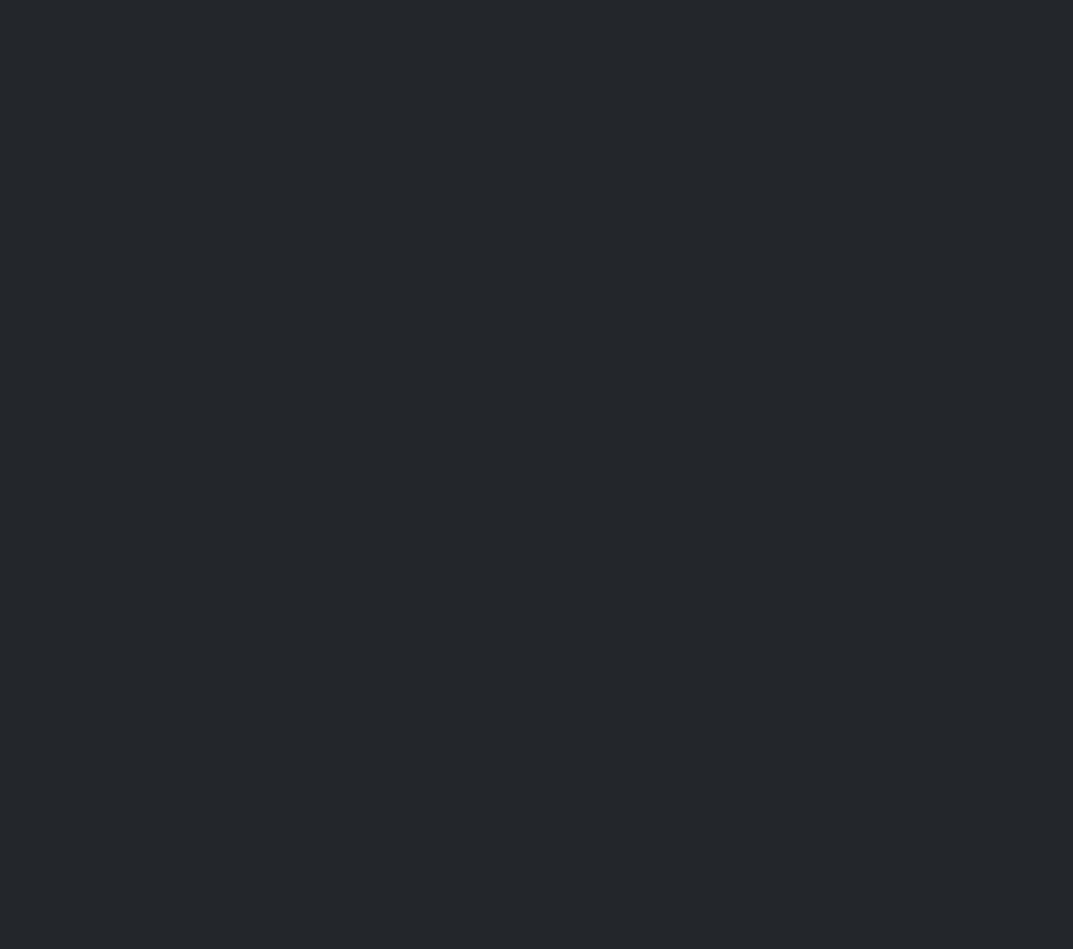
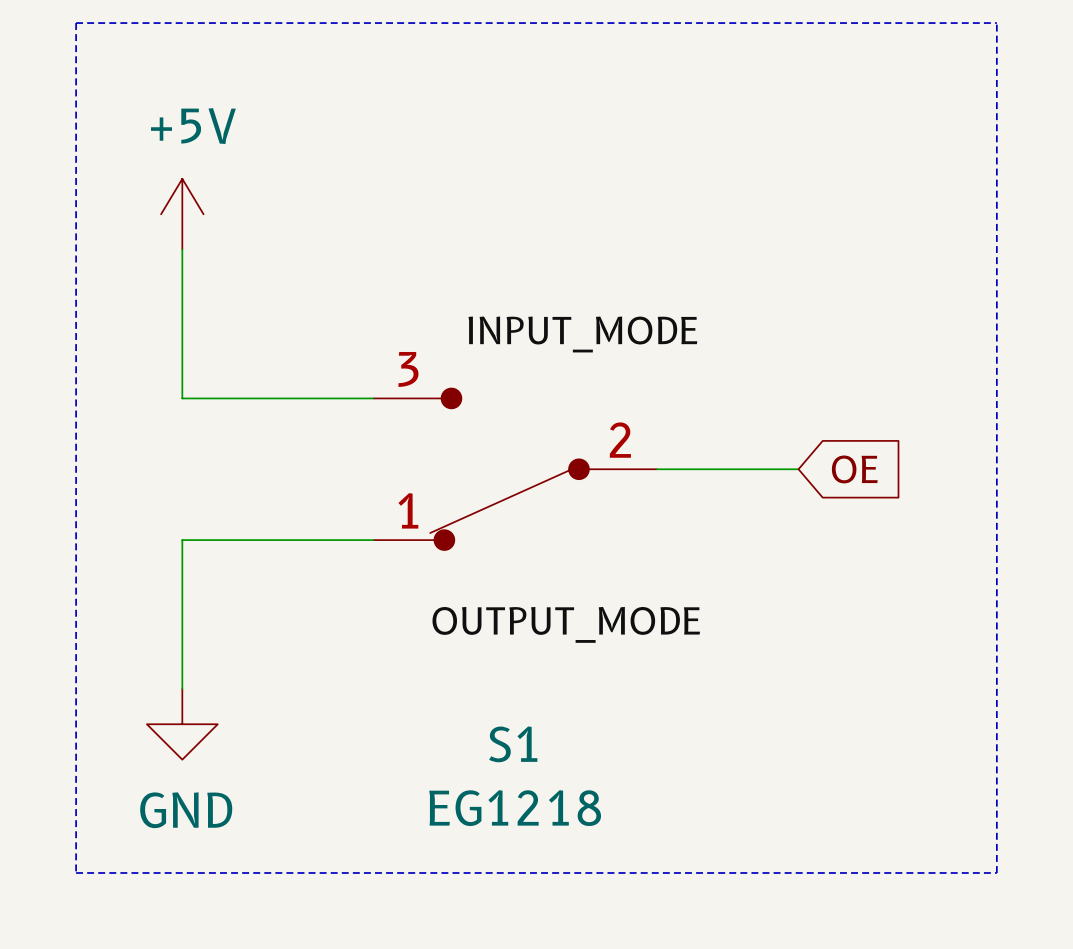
line: none -> (76, 23) (996, 23) (996, 872) (76, 872) (76, 23)
power symbol: none -> +5V (182, 214)
wire: none -> (182, 249) (182, 398) (373, 398)
label: none -> INPUT_MODE (582, 334)
S1: none -> EG1218 (515, 469)
wire: none -> (656, 469) (798, 469)
global label: none -> OE (854, 469)
wire: none -> (373, 540) (182, 540) (182, 688)
label: none -> OUTPUT_MODE (566, 624)
power symbol: none -> GND (182, 724)

